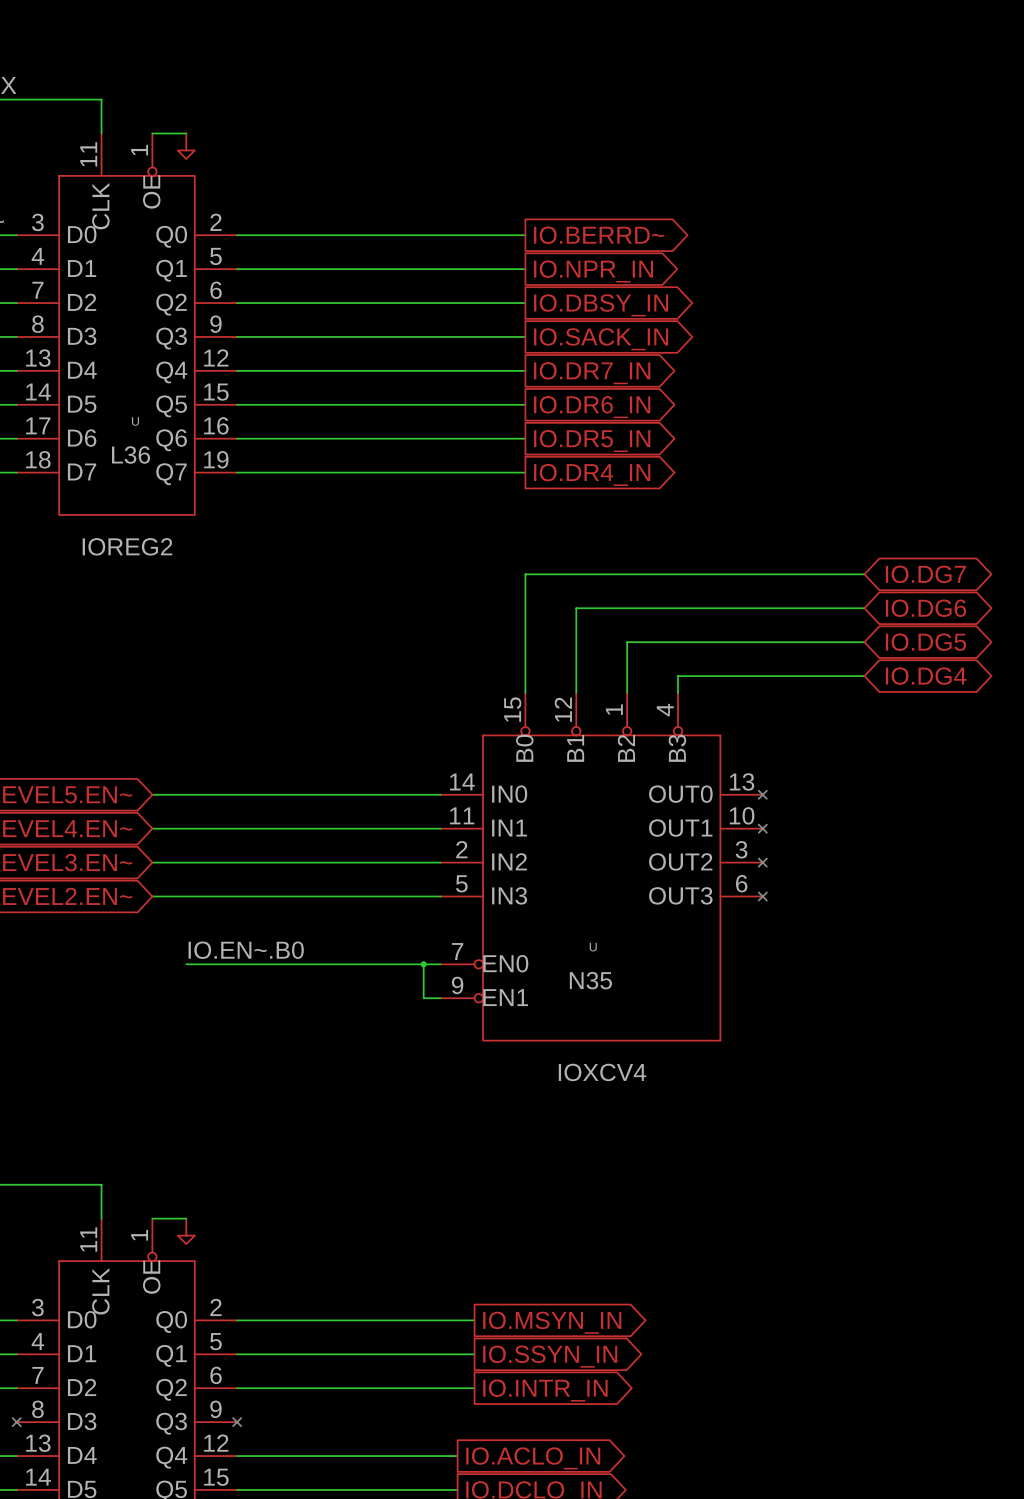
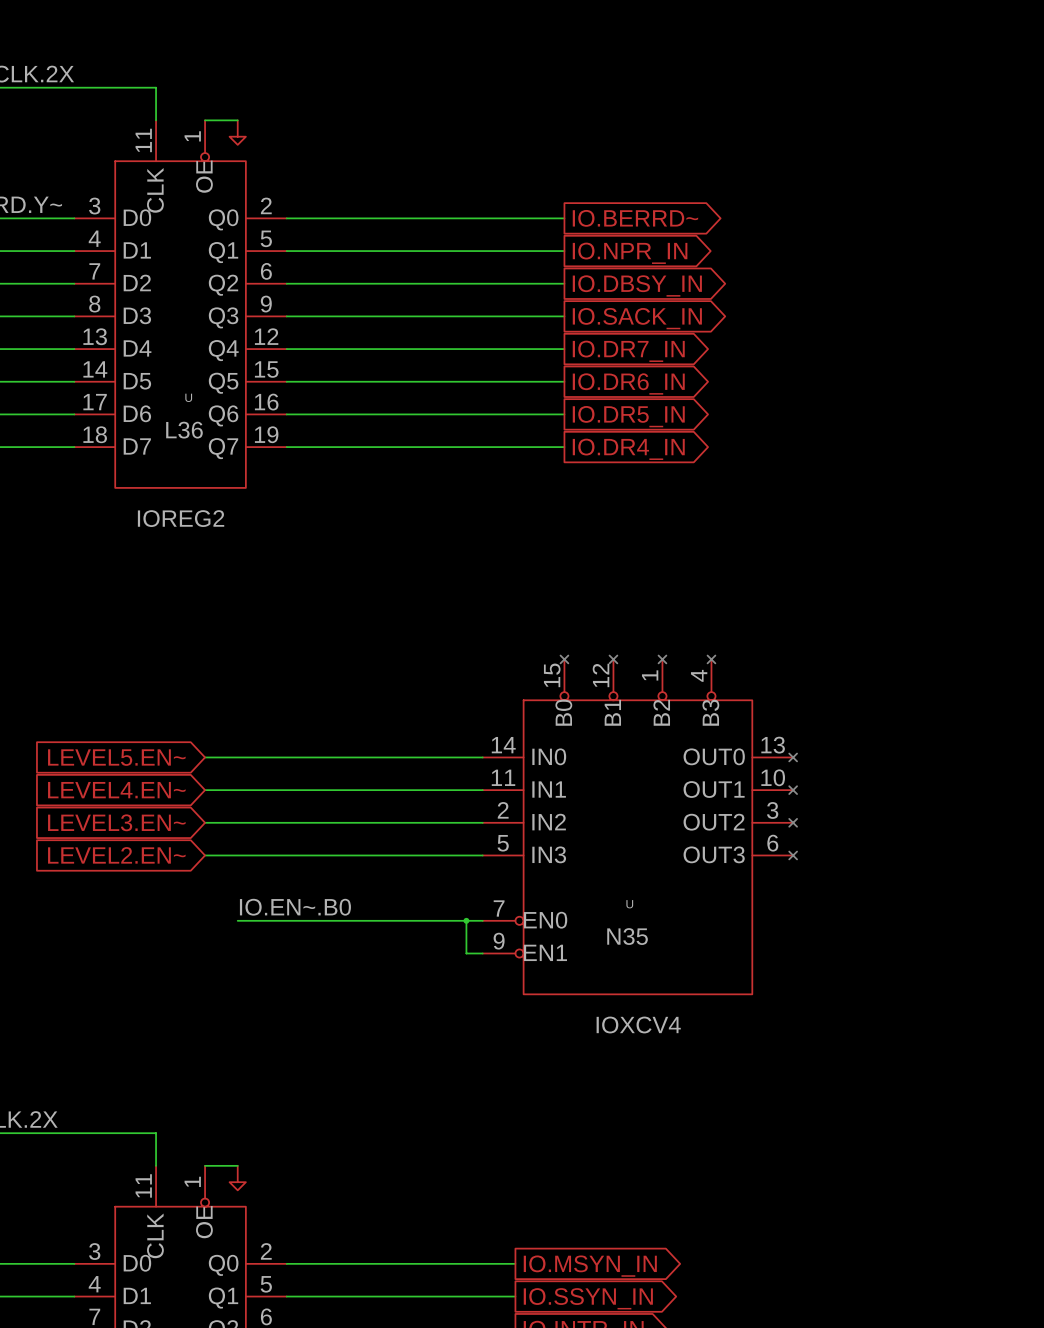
wire: (864, 574) (525, 574) (525, 693) -> none
global label: IO.DG7 (925, 574) -> none
wire: (864, 608) (576, 608) (576, 693) -> none
global label: IO.DG6 (925, 608) -> none
wire: (864, 642) (627, 642) (627, 693) -> none
global label: IO.DG5 (926, 642) -> none
wire: (864, 676) (678, 676) (678, 693) -> none
global label: IO.DG4 (926, 676) -> none
no-connect mark: none -> (564, 659)
no-connect mark: none -> (613, 659)
no-connect mark: none -> (662, 659)
no-connect mark: none -> (711, 659)

